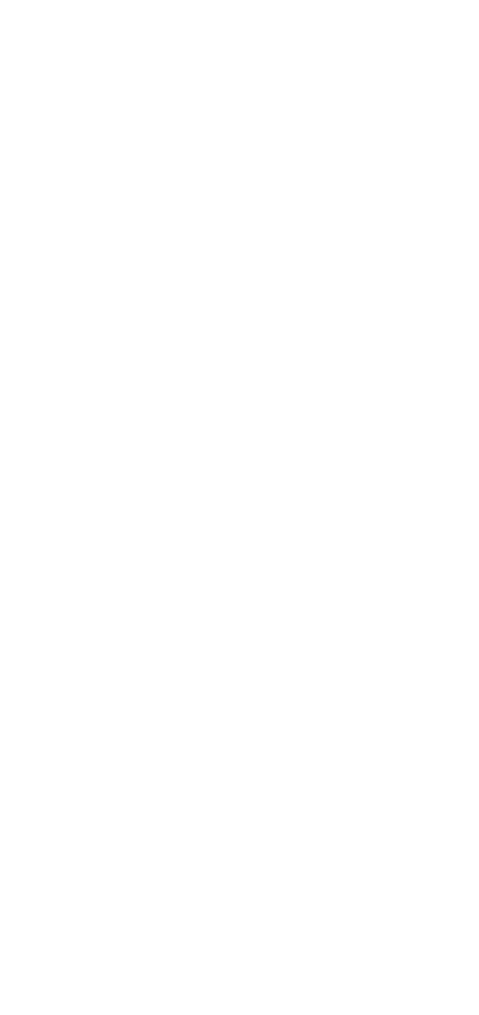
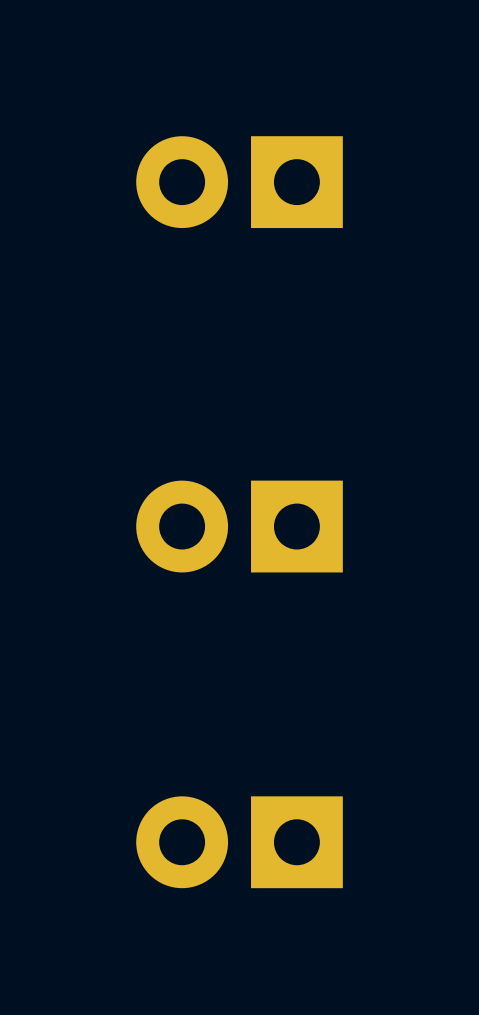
part: none -> (239, 182)
part: none -> (239, 526)
part: none -> (239, 842)

